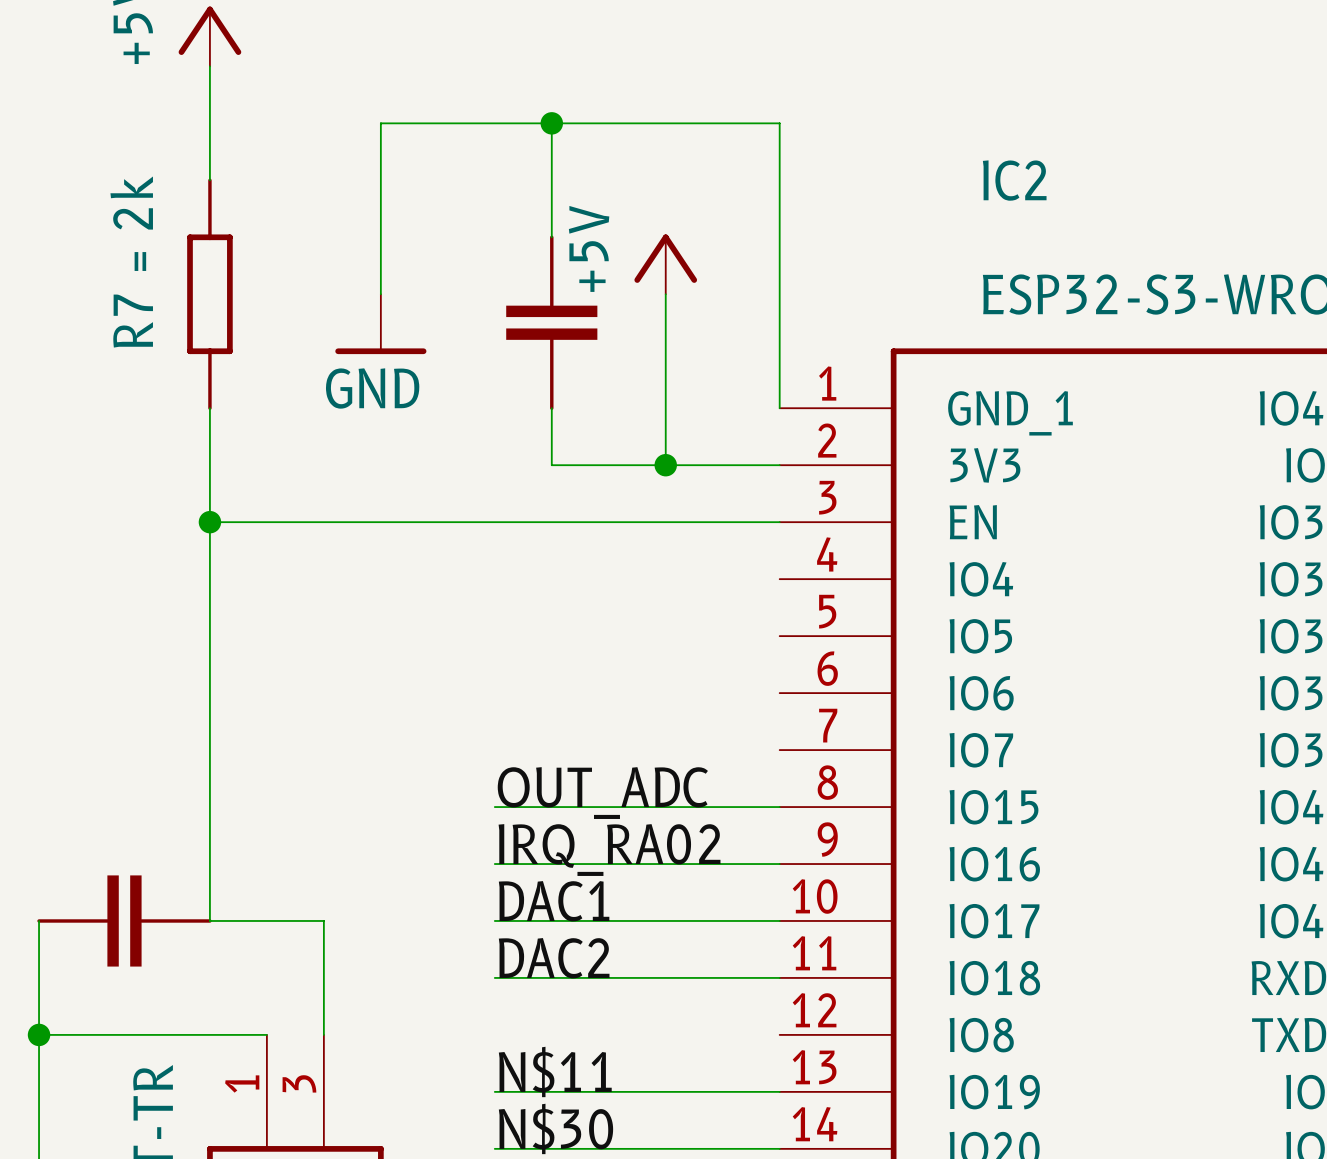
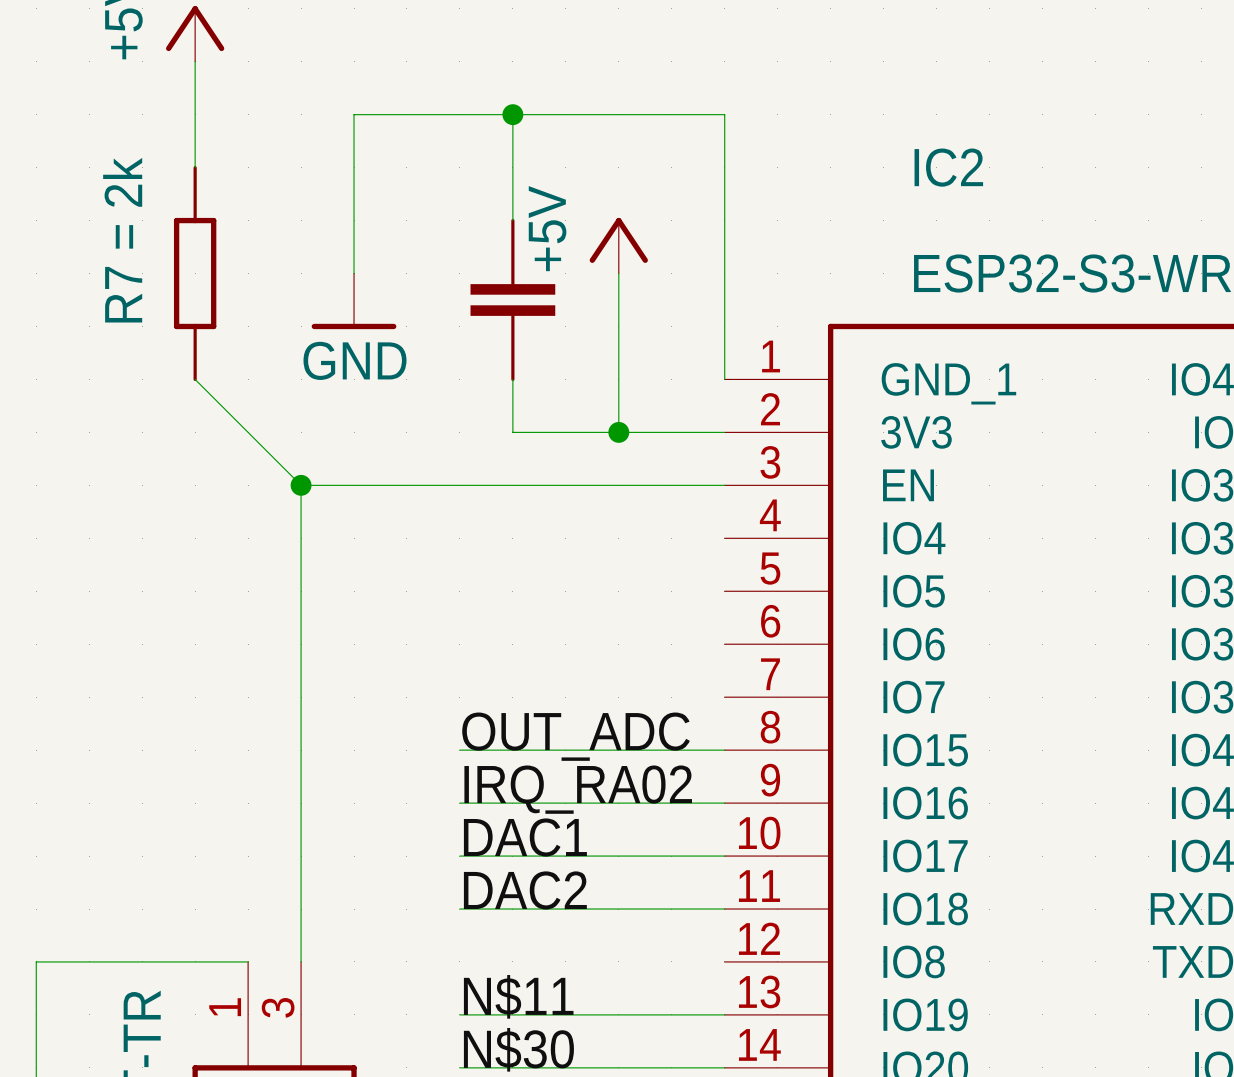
wire: (209, 408) (209, 920) (323, 920) -> (195, 379) (301, 485) (301, 856)
wire: (209, 522) (323, 522) -> none
junction position: (209, 522) -> (301, 485)
wire: (39, 920) (39, 1034) -> none
part: (124, 920) -> none
junction: (39, 1034) -> none

